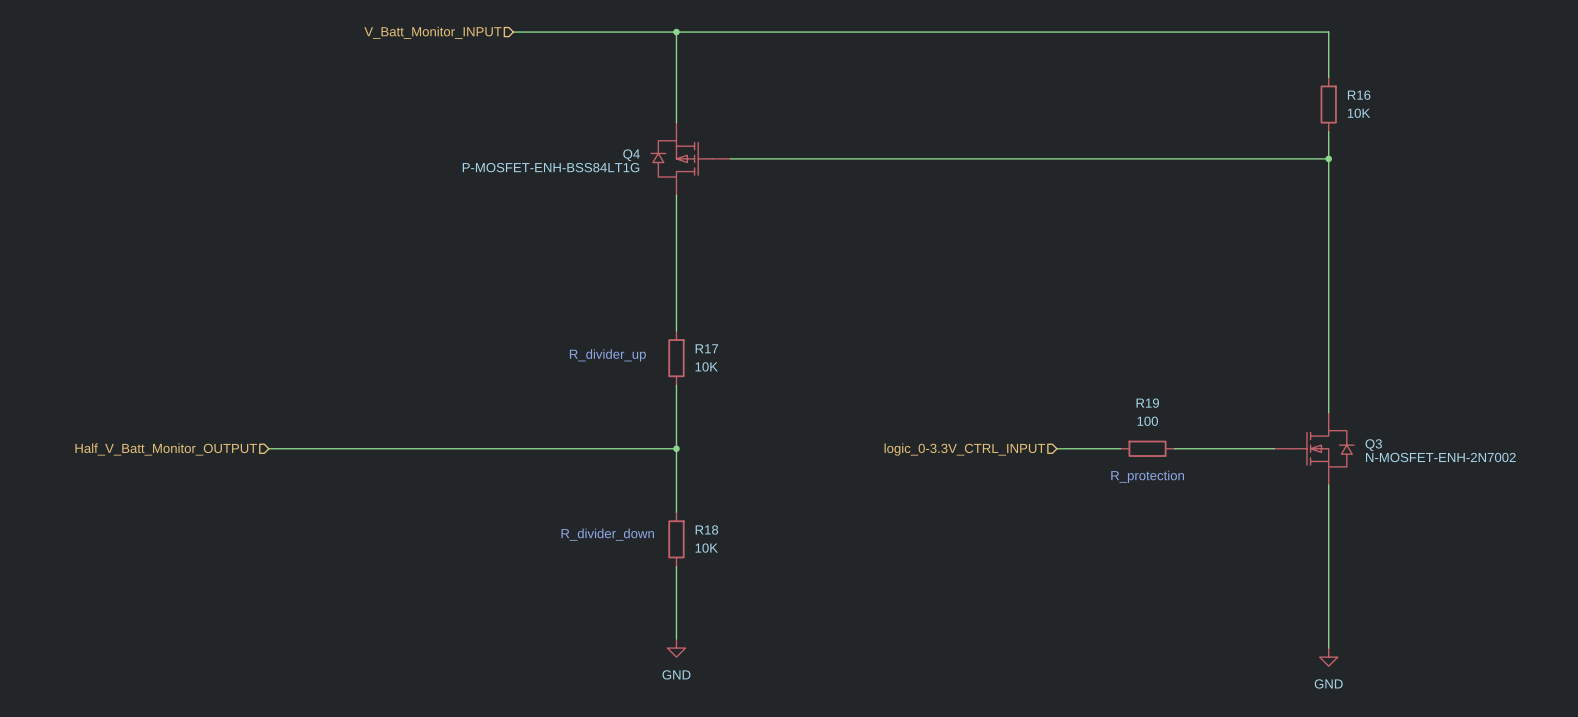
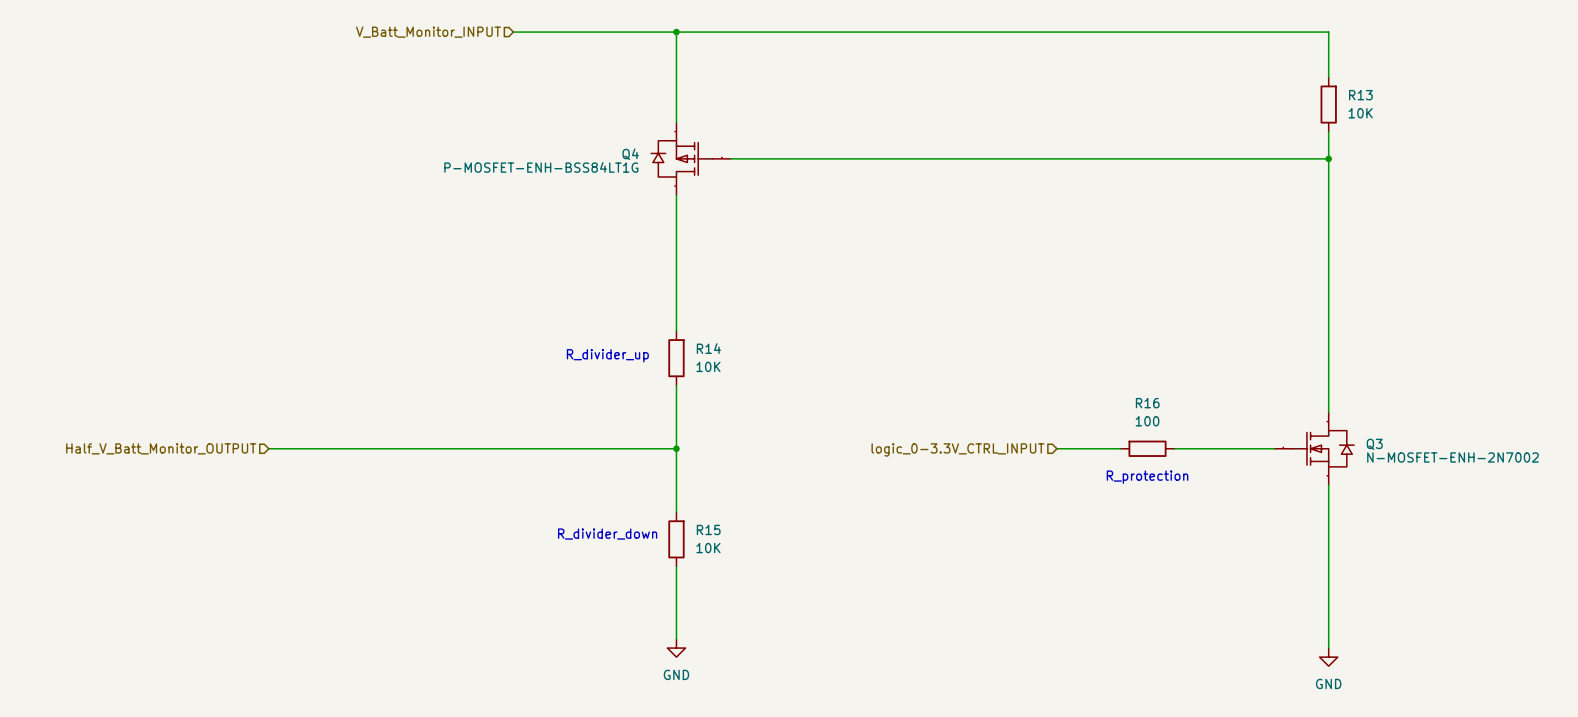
R16 name: R16 (1359, 95) -> R13 (1360, 95)
R17 name: R17 (706, 348) -> R14 (708, 348)
R19 name: R19 (1147, 403) -> R16 (1147, 403)
R18 name: R18 (706, 529) -> R15 (708, 529)

